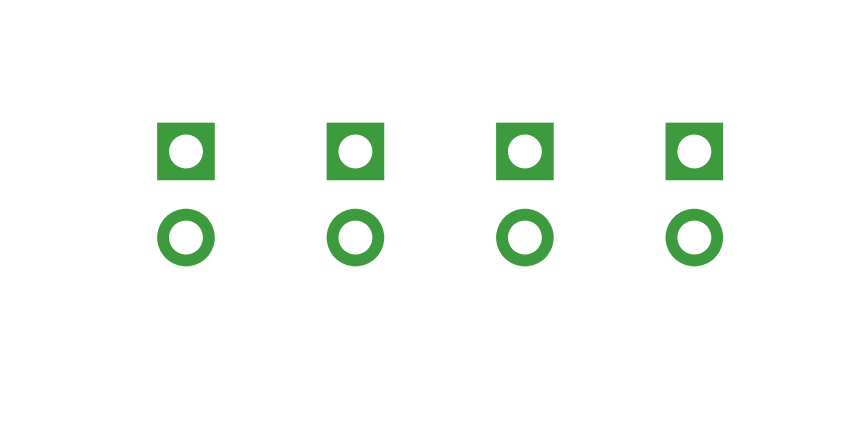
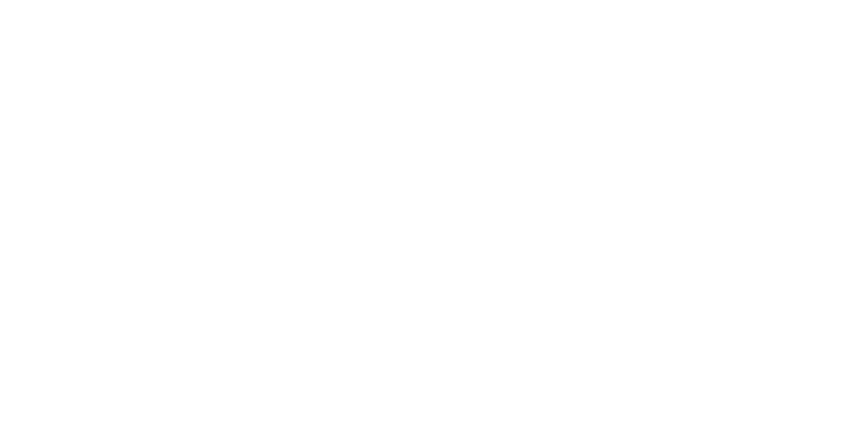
part: (185, 194) -> none
part: (355, 194) -> none
part: (524, 194) -> none
part: (694, 194) -> none

